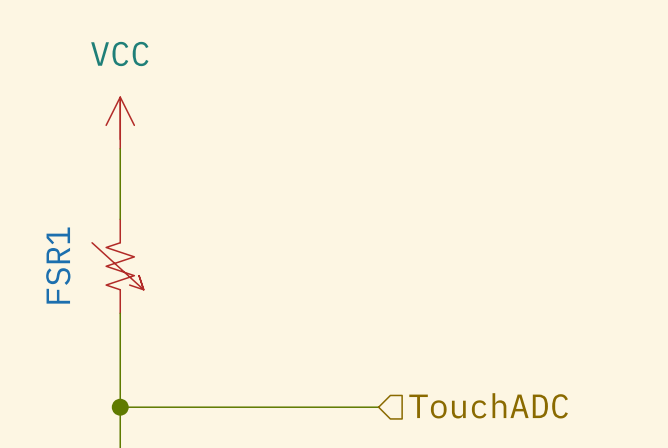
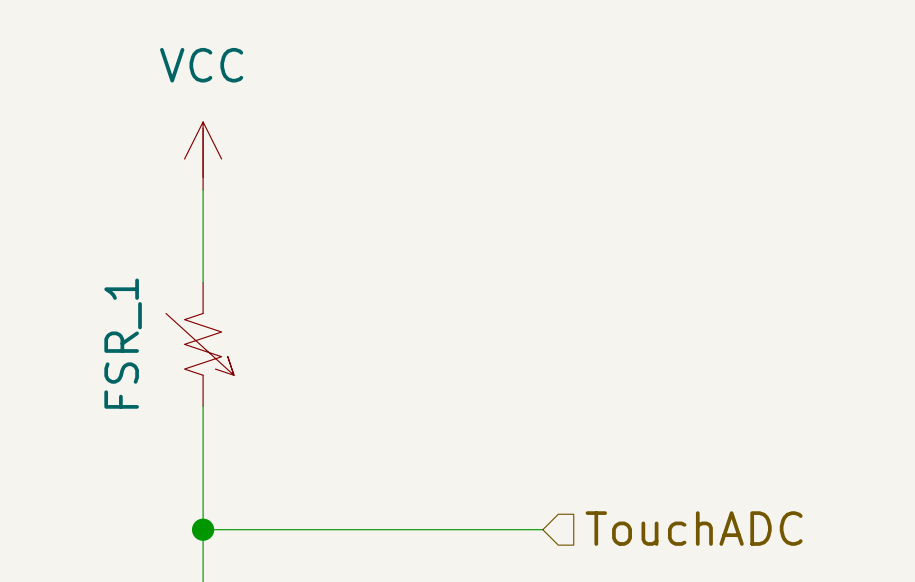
FSR1 name: FSR1 (58, 265) -> FSR_1 (123, 343)

